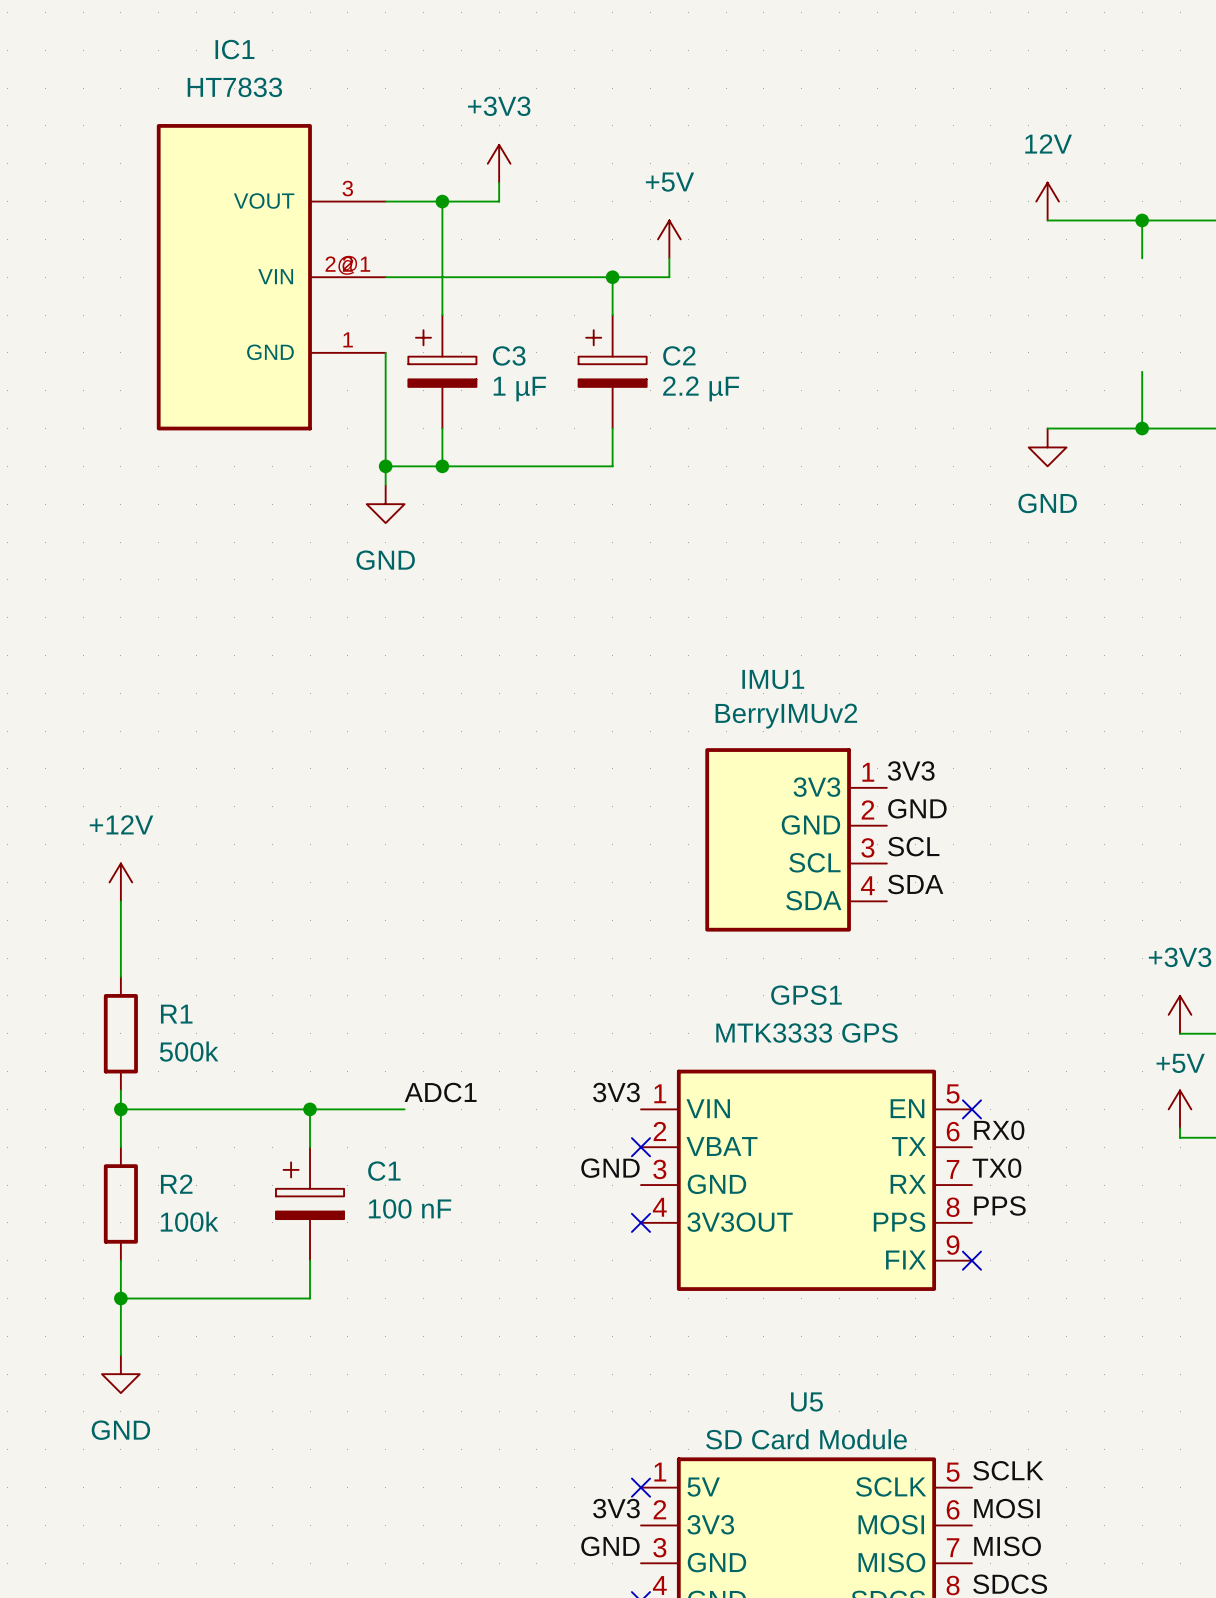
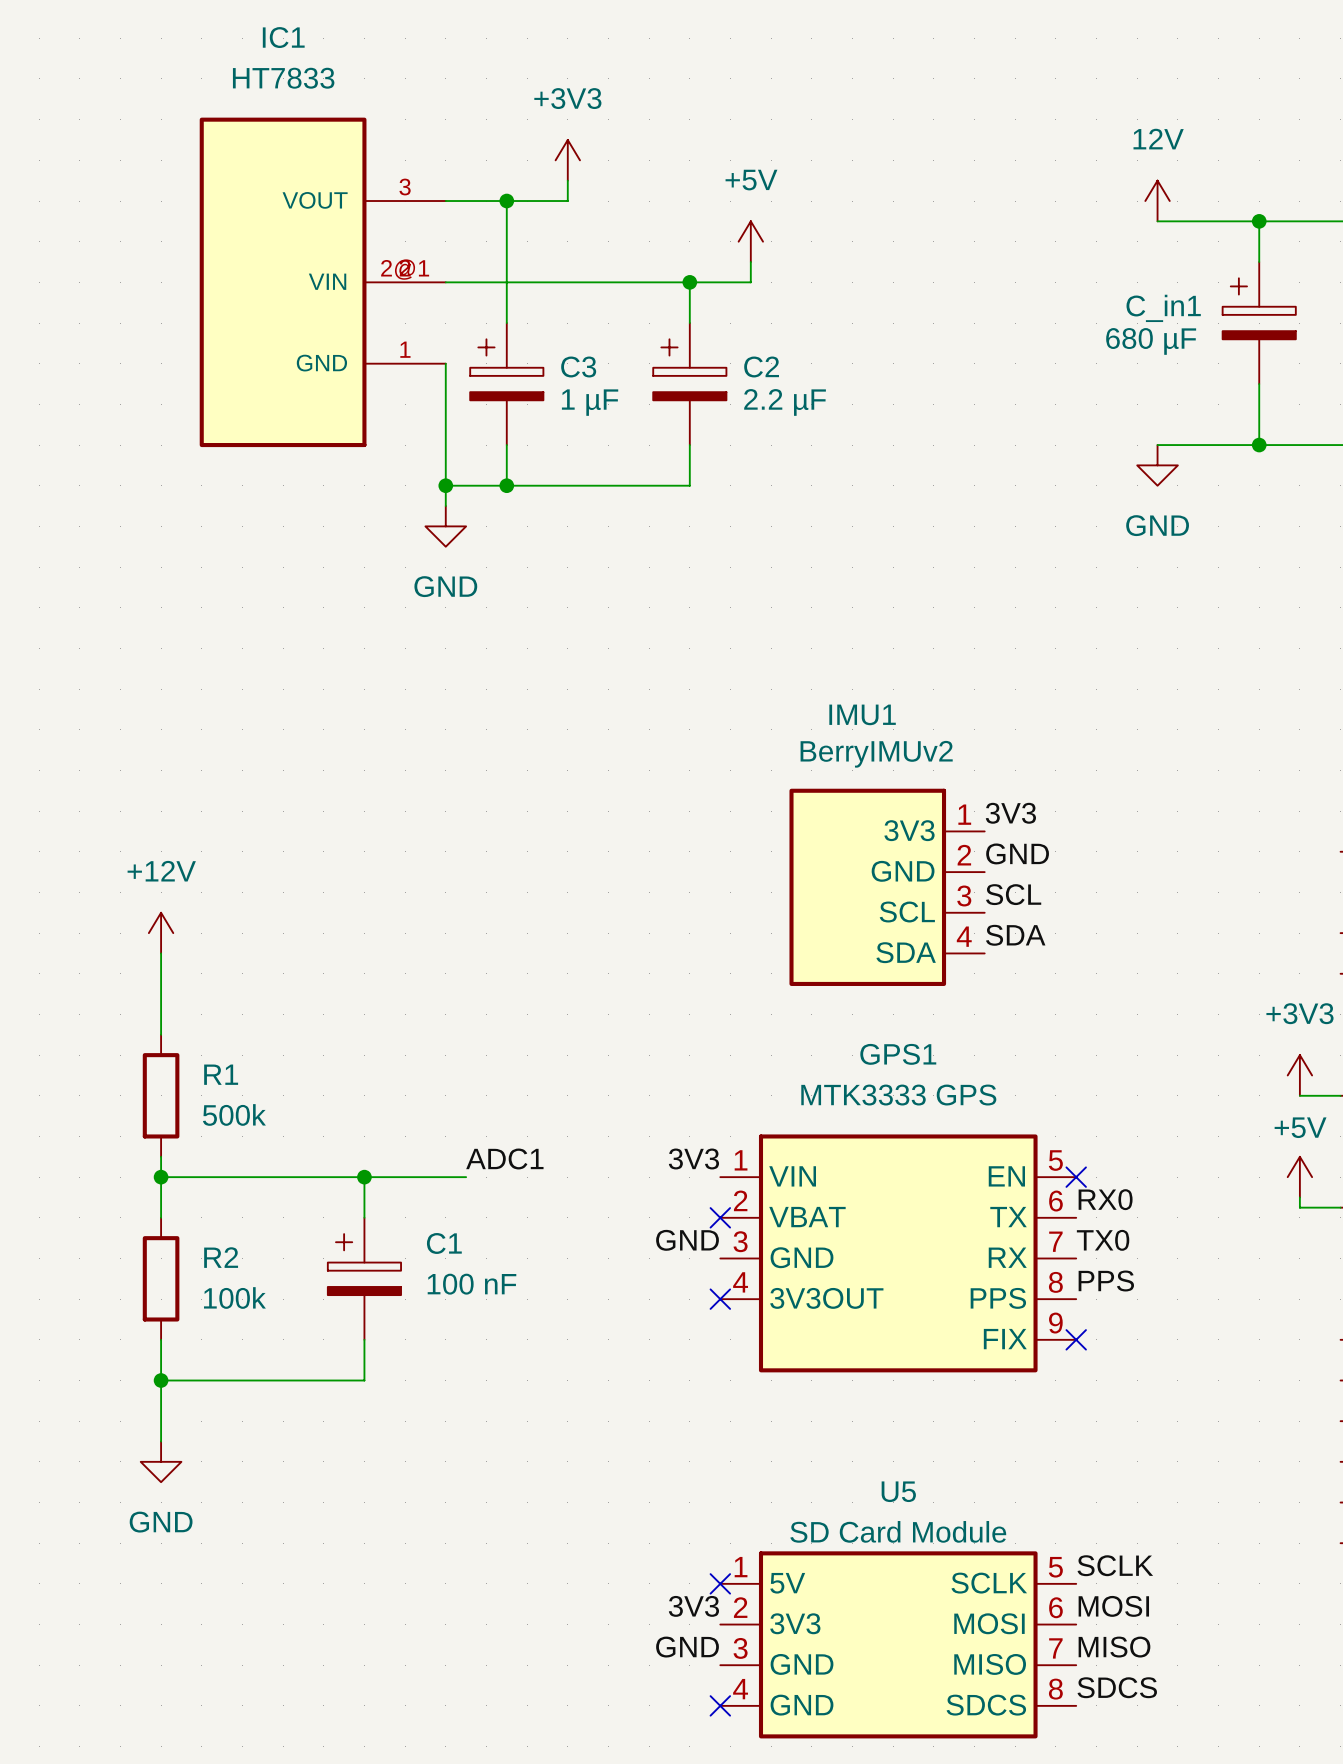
C_in1: none -> 680 µF (1259, 323)

